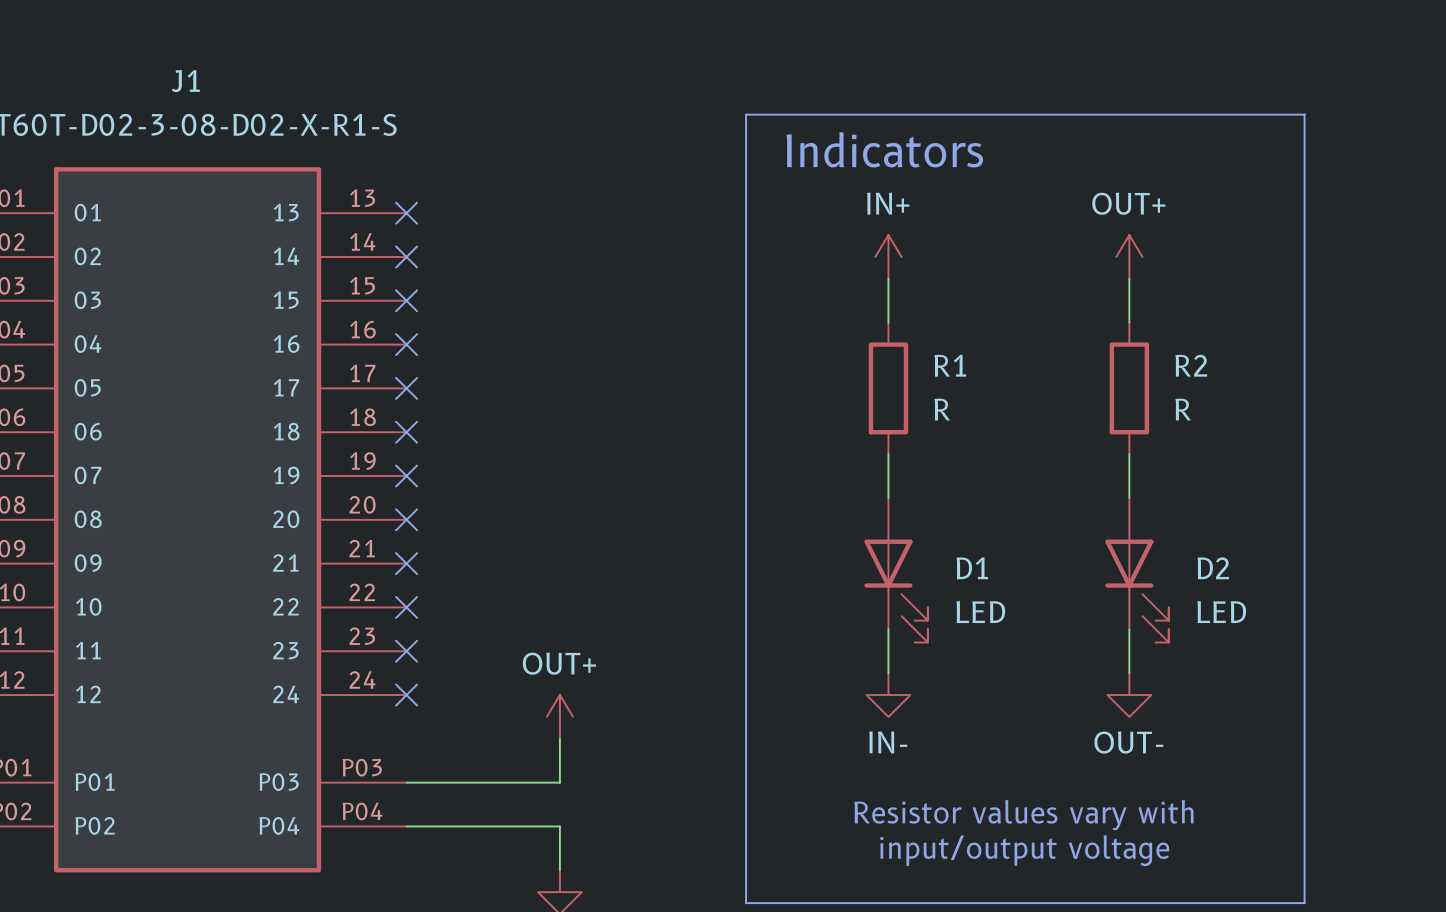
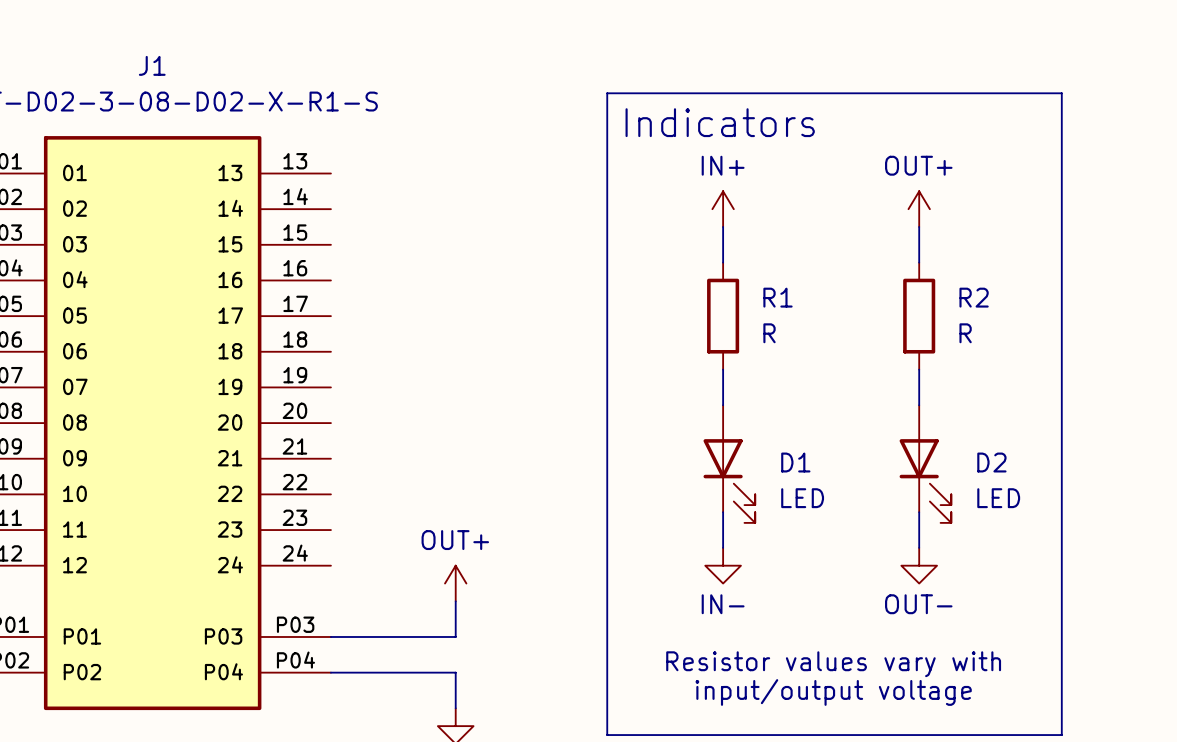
no-connect mark: (406, 213) -> none
no-connect mark: (406, 256) -> none
no-connect mark: (406, 300) -> none
no-connect mark: (406, 344) -> none
no-connect mark: (406, 388) -> none
no-connect mark: (406, 432) -> none
no-connect mark: (406, 476) -> none
no-connect mark: (406, 519) -> none
no-connect mark: (406, 563) -> none
no-connect mark: (406, 607) -> none
no-connect mark: (406, 651) -> none
no-connect mark: (406, 695) -> none

